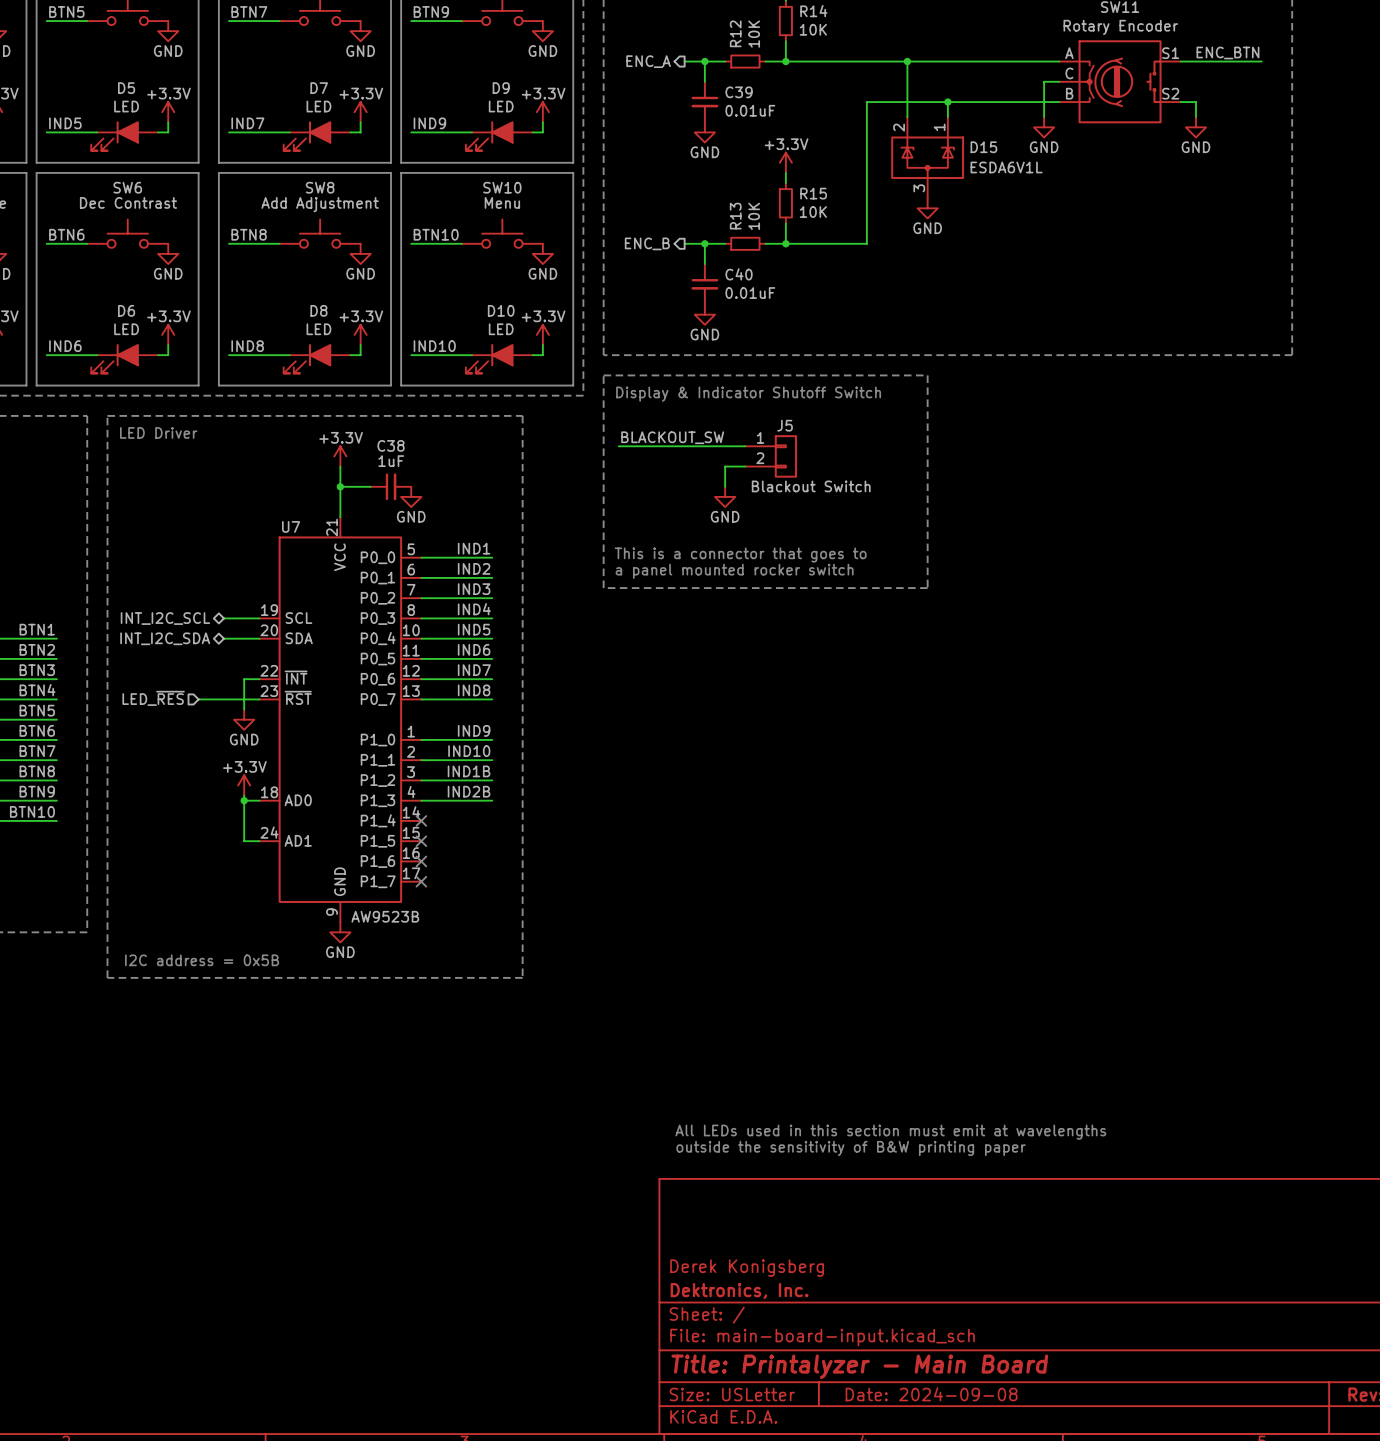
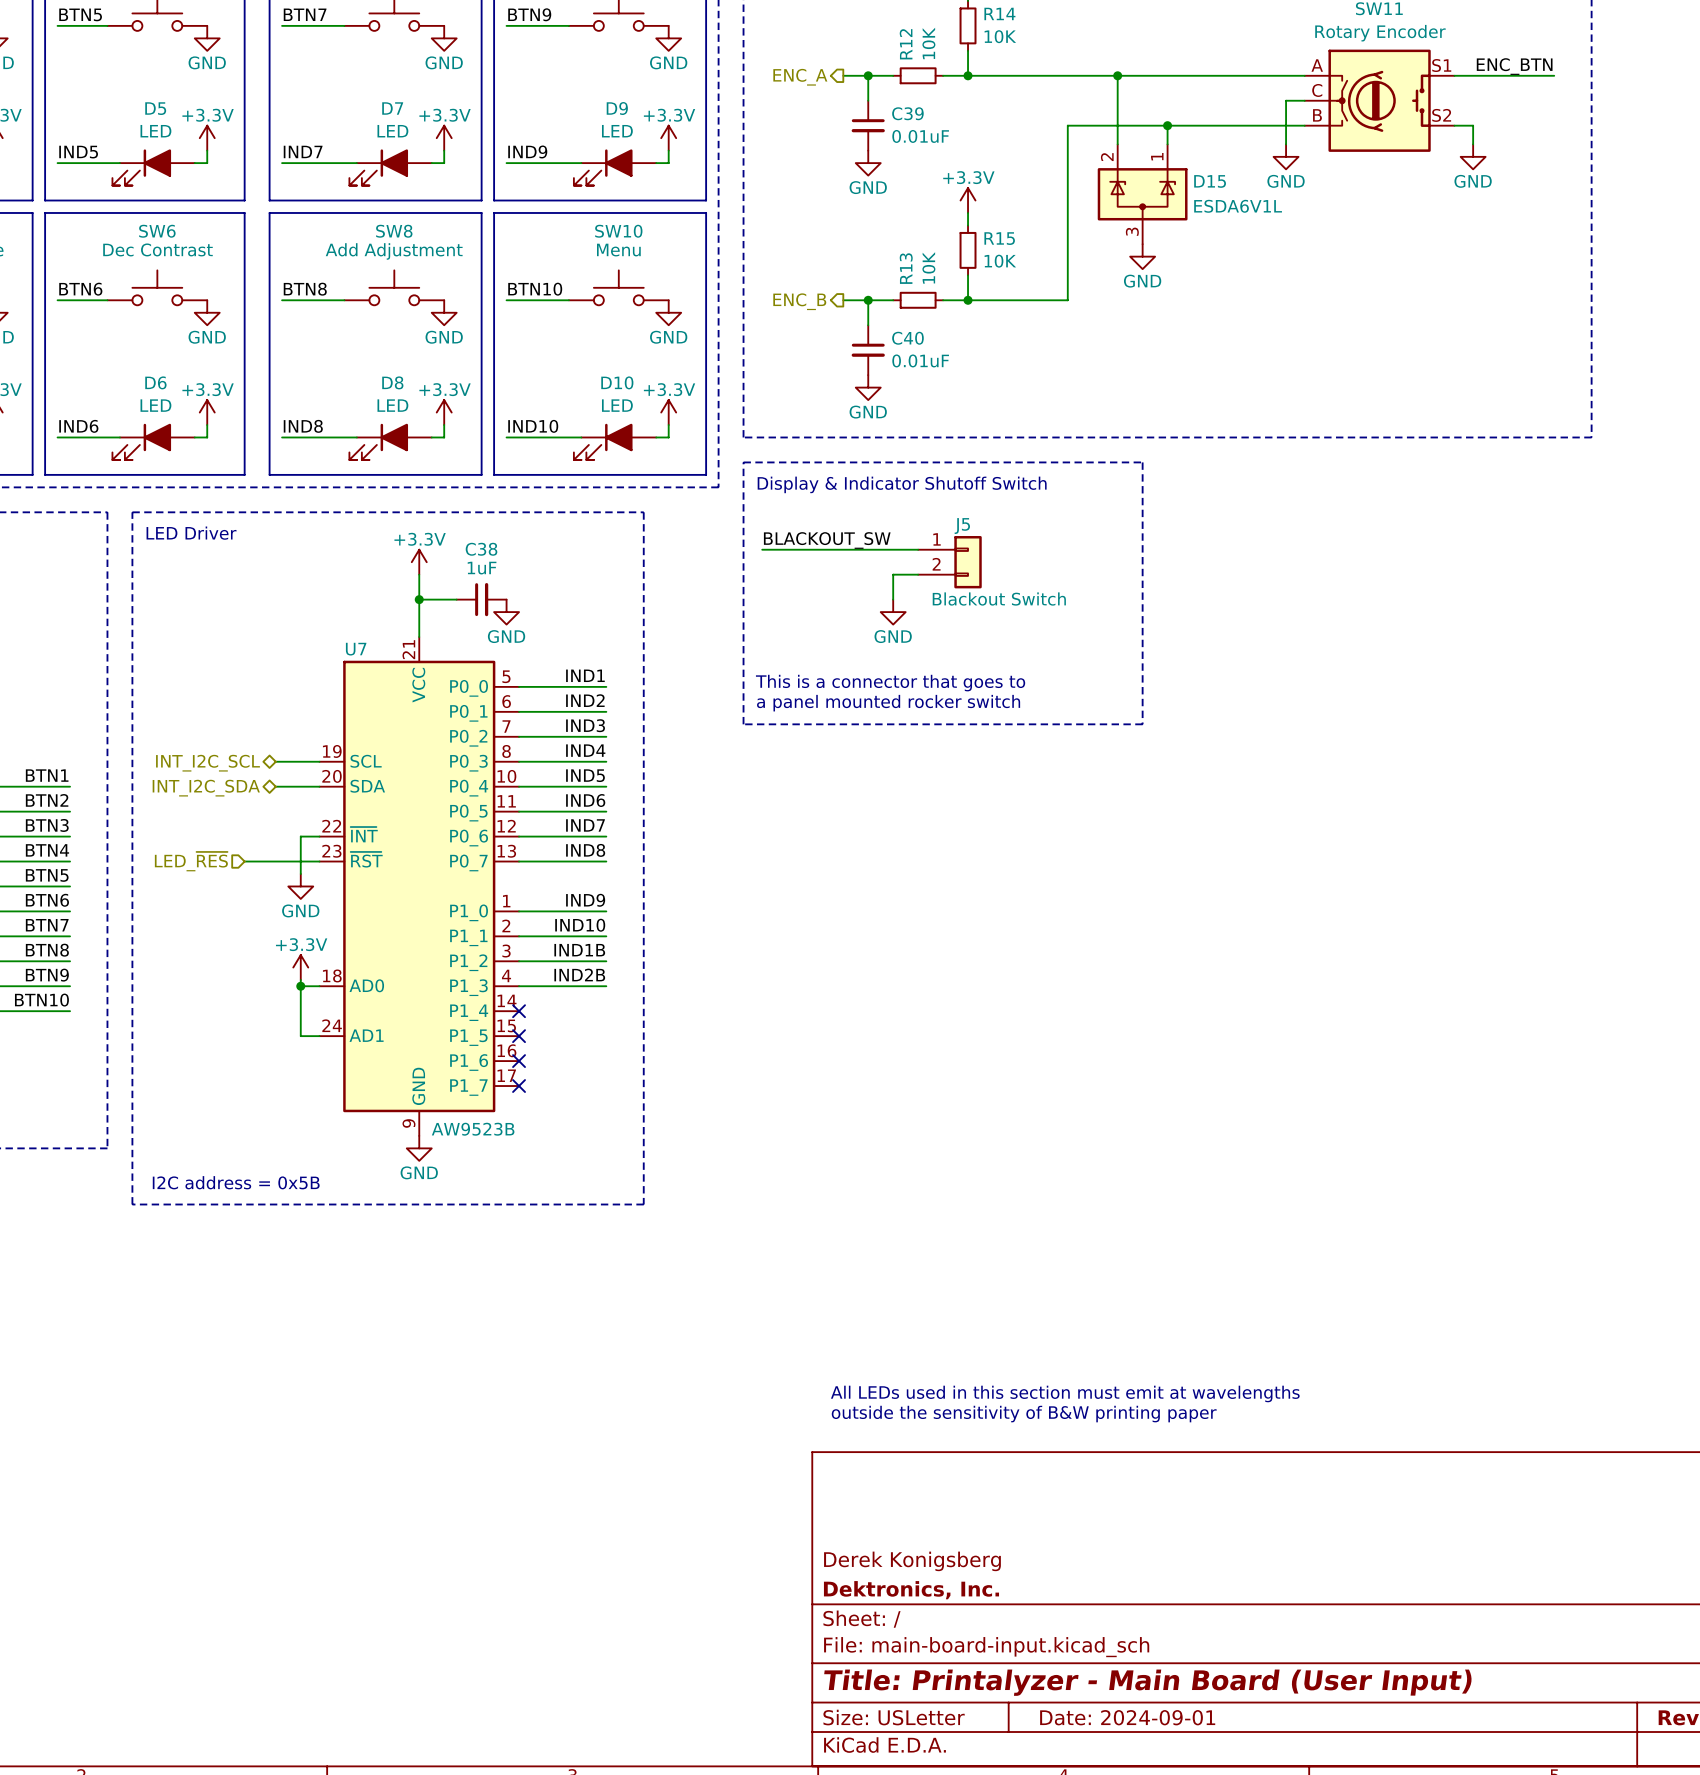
title block: Title: Printalyzer - Main Board (859, 1366) -> Title: Printalyzer - Main Board (User Input) (1147, 1682)
title block: Date: 2024-09-08 (931, 1394) -> Date: 2024-09-01 (1127, 1717)

